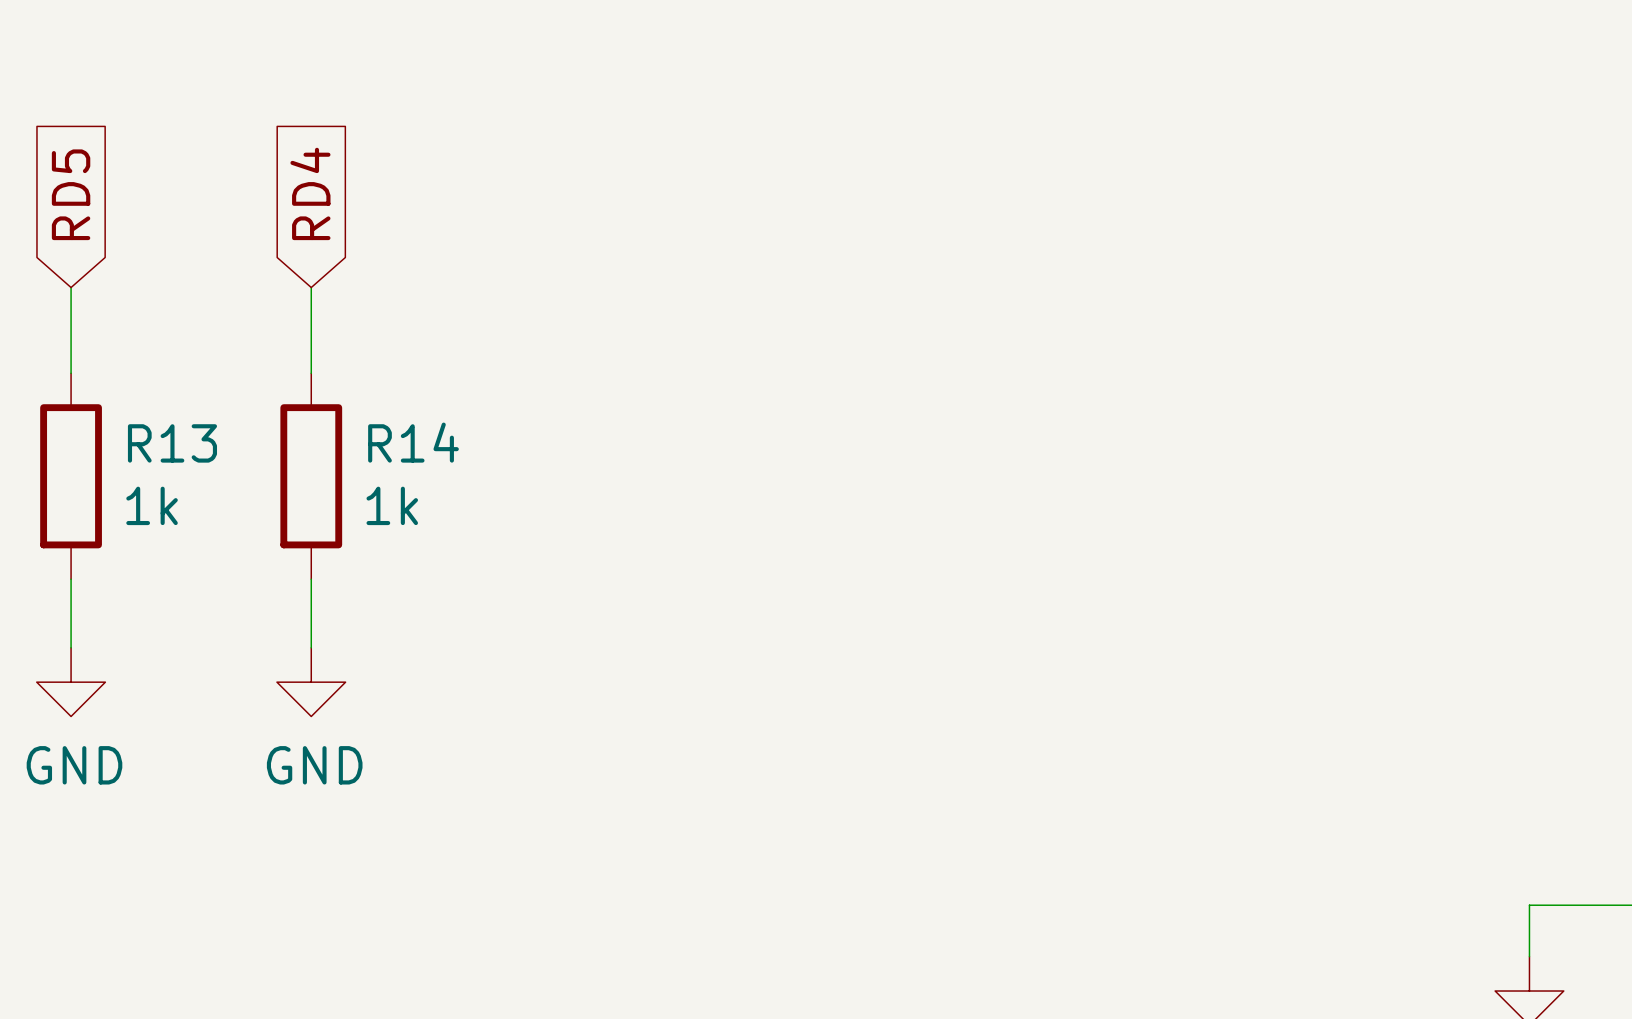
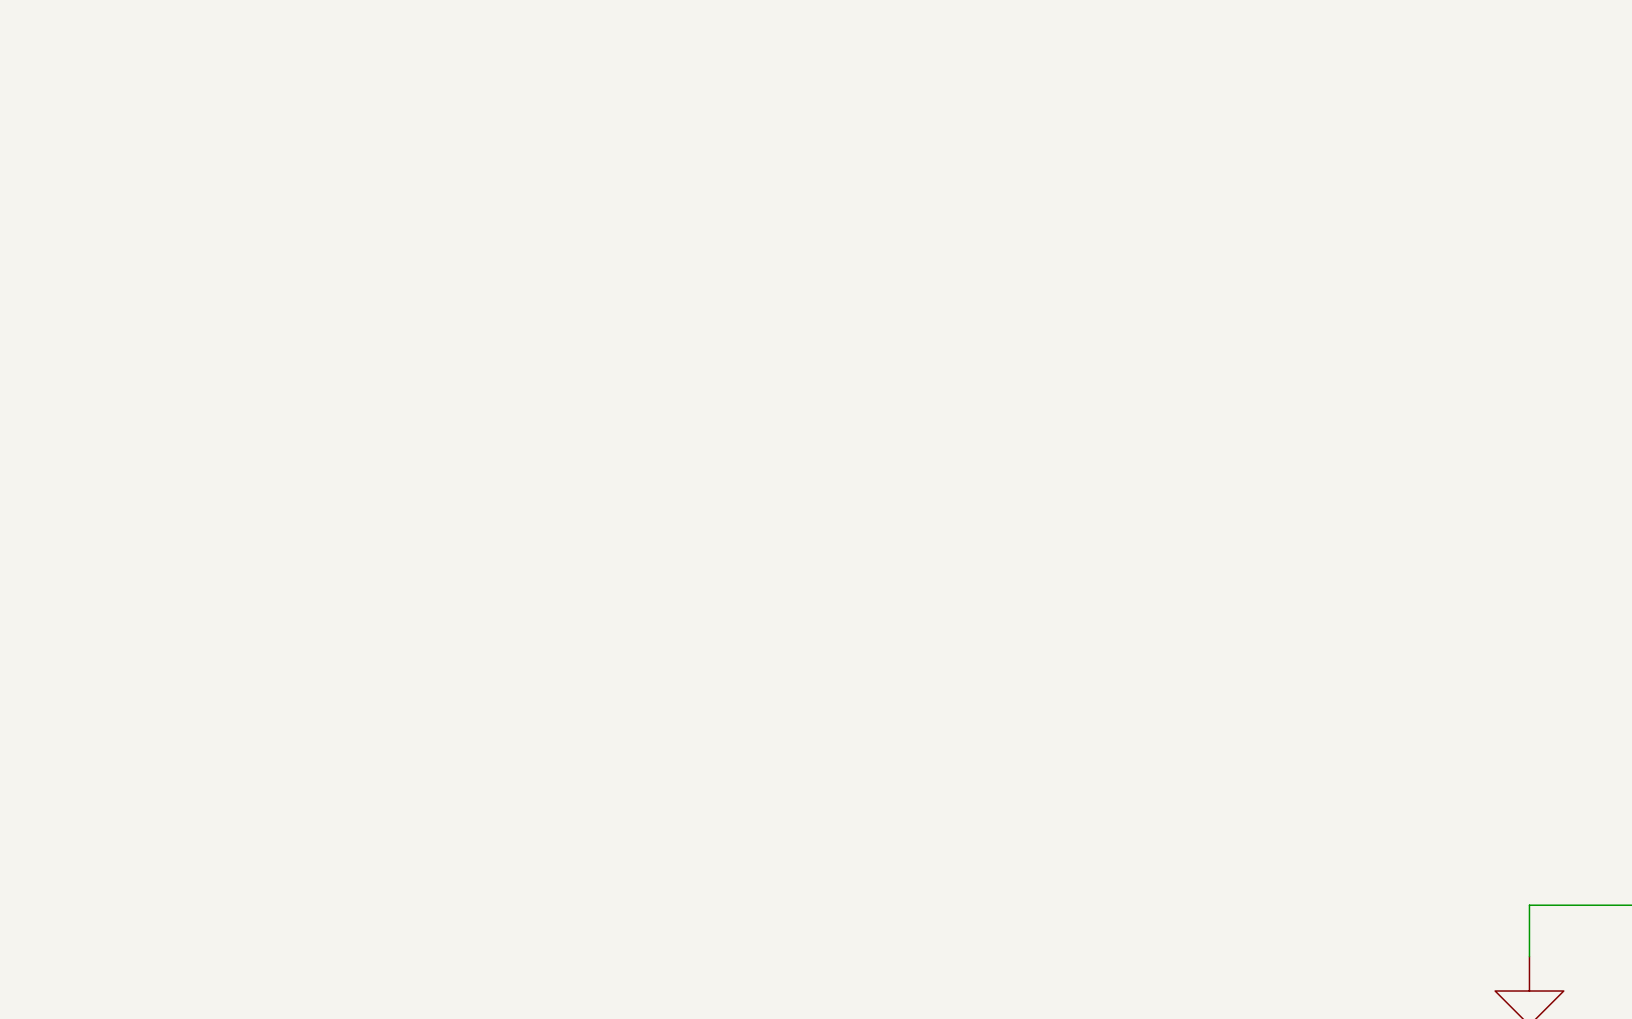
global label: RD4 (310, 193) -> none
global label: RD5 (71, 194) -> none
wire: (71, 287) (71, 373) -> none
wire: (311, 287) (311, 373) -> none
R13: 1k (71, 476) -> none
R14: 1k (311, 476) -> none
wire: (71, 579) (71, 647) -> none
wire: (311, 579) (311, 647) -> none
power symbol: GND (71, 682) -> none
power symbol: GND (311, 682) -> none

